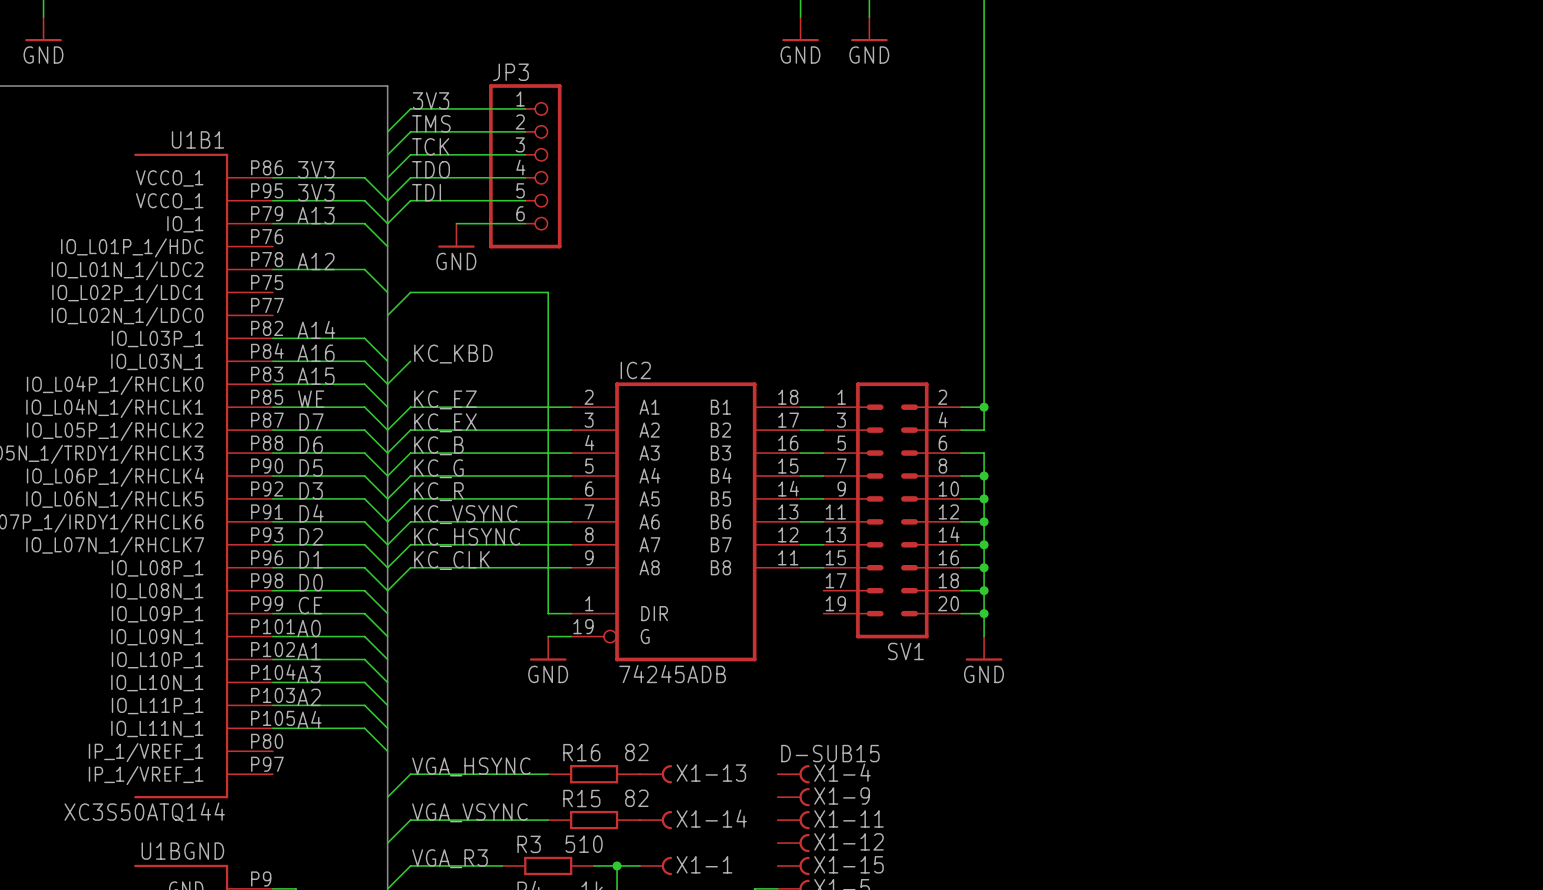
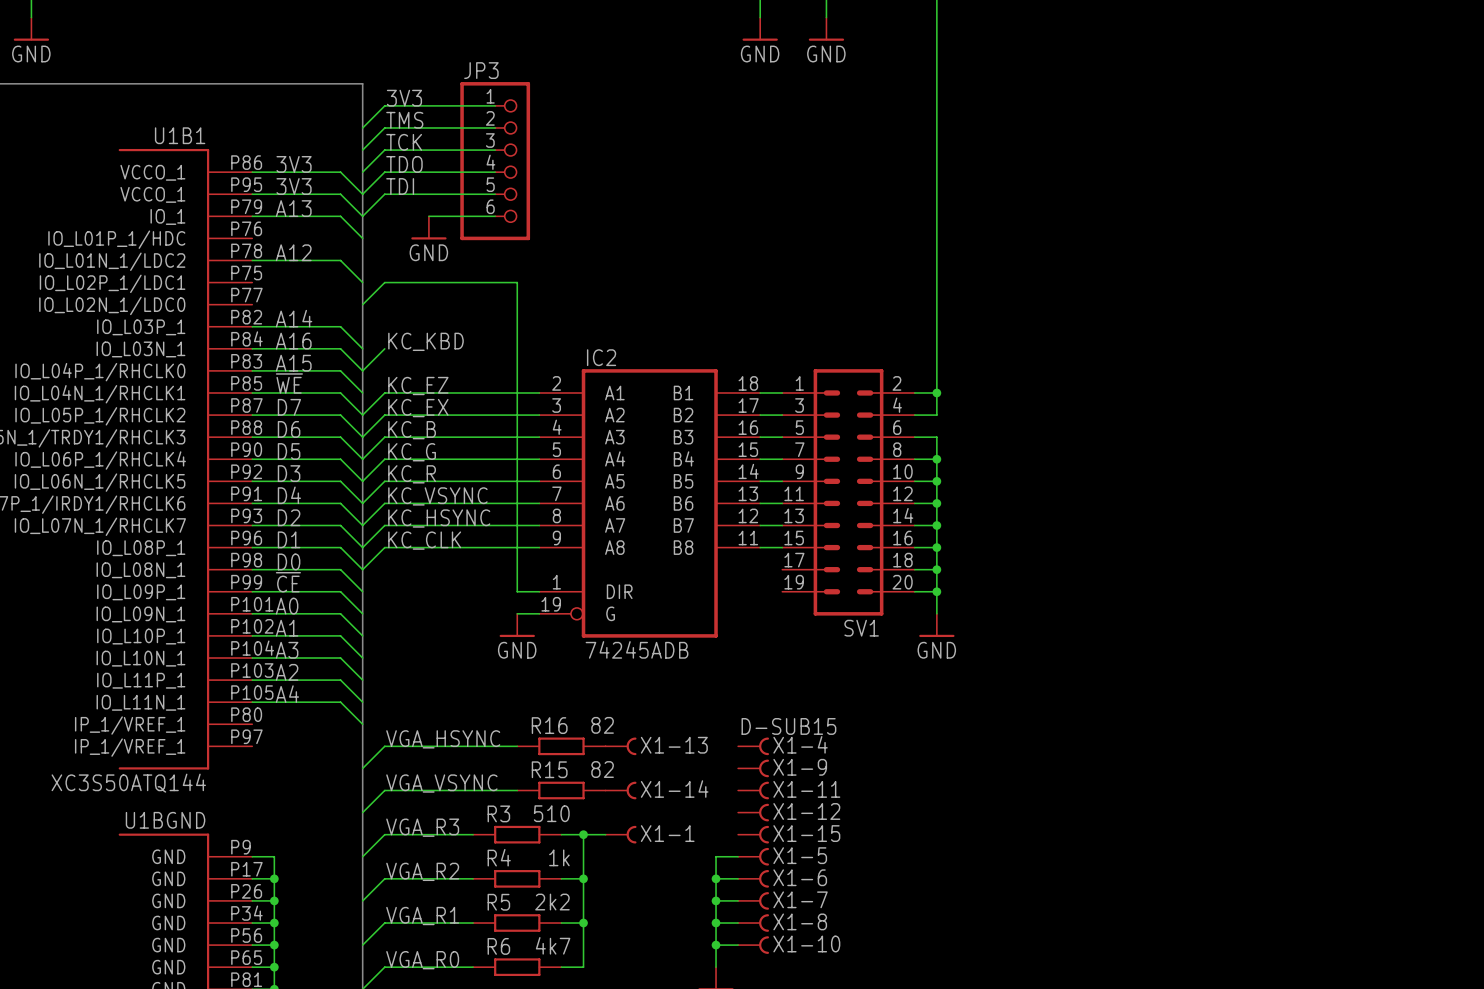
label: WE (311, 399) -> ~{WE} (289, 383)
label: CE (310, 605) -> ~{CE} (288, 582)

